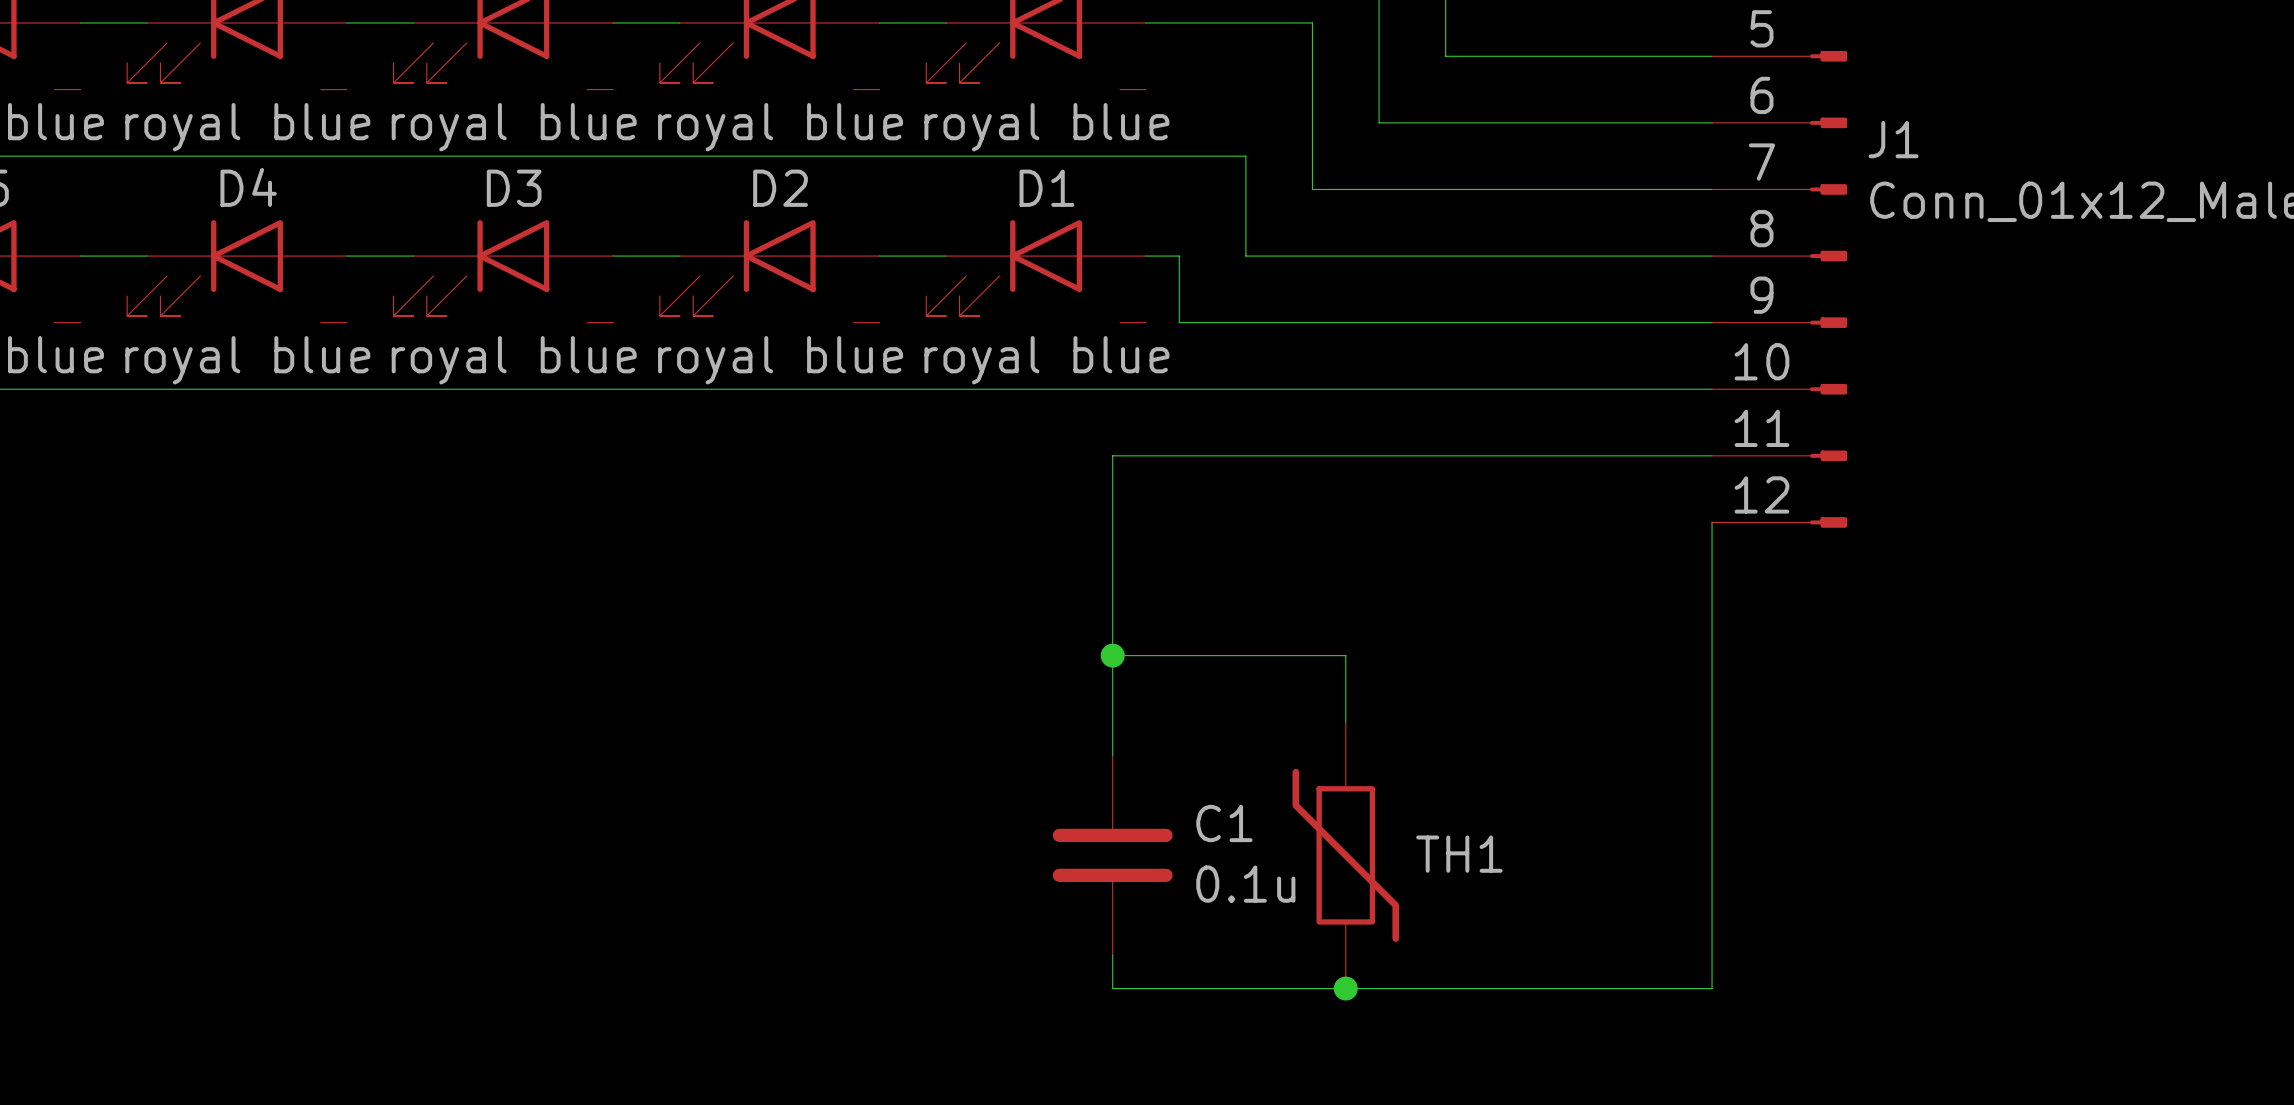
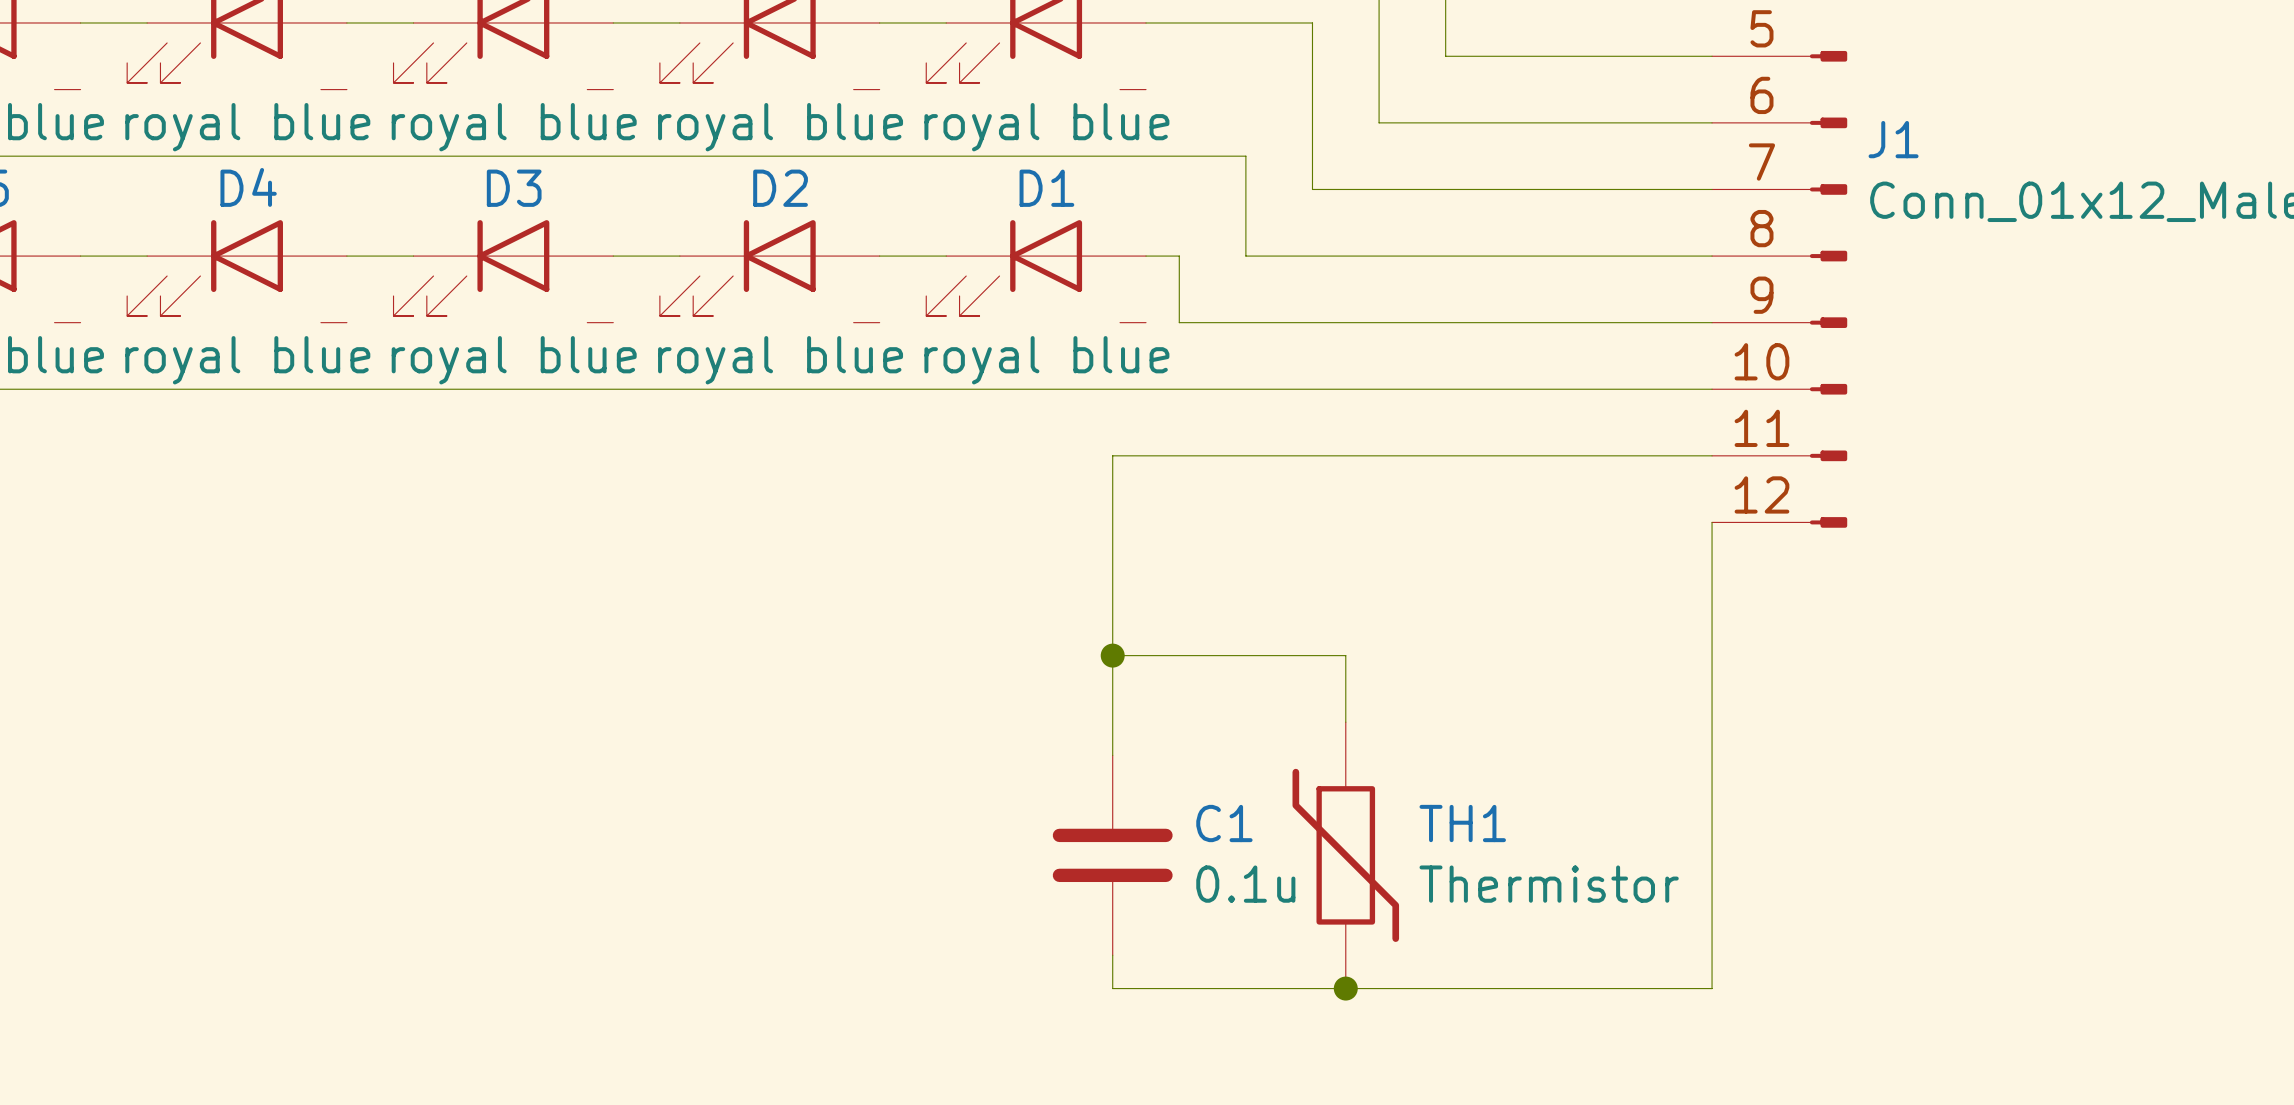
TH1 name position: TH1 (1459, 854) -> TH1 (1462, 823)
TH1 value: none -> Thermistor (1549, 884)

